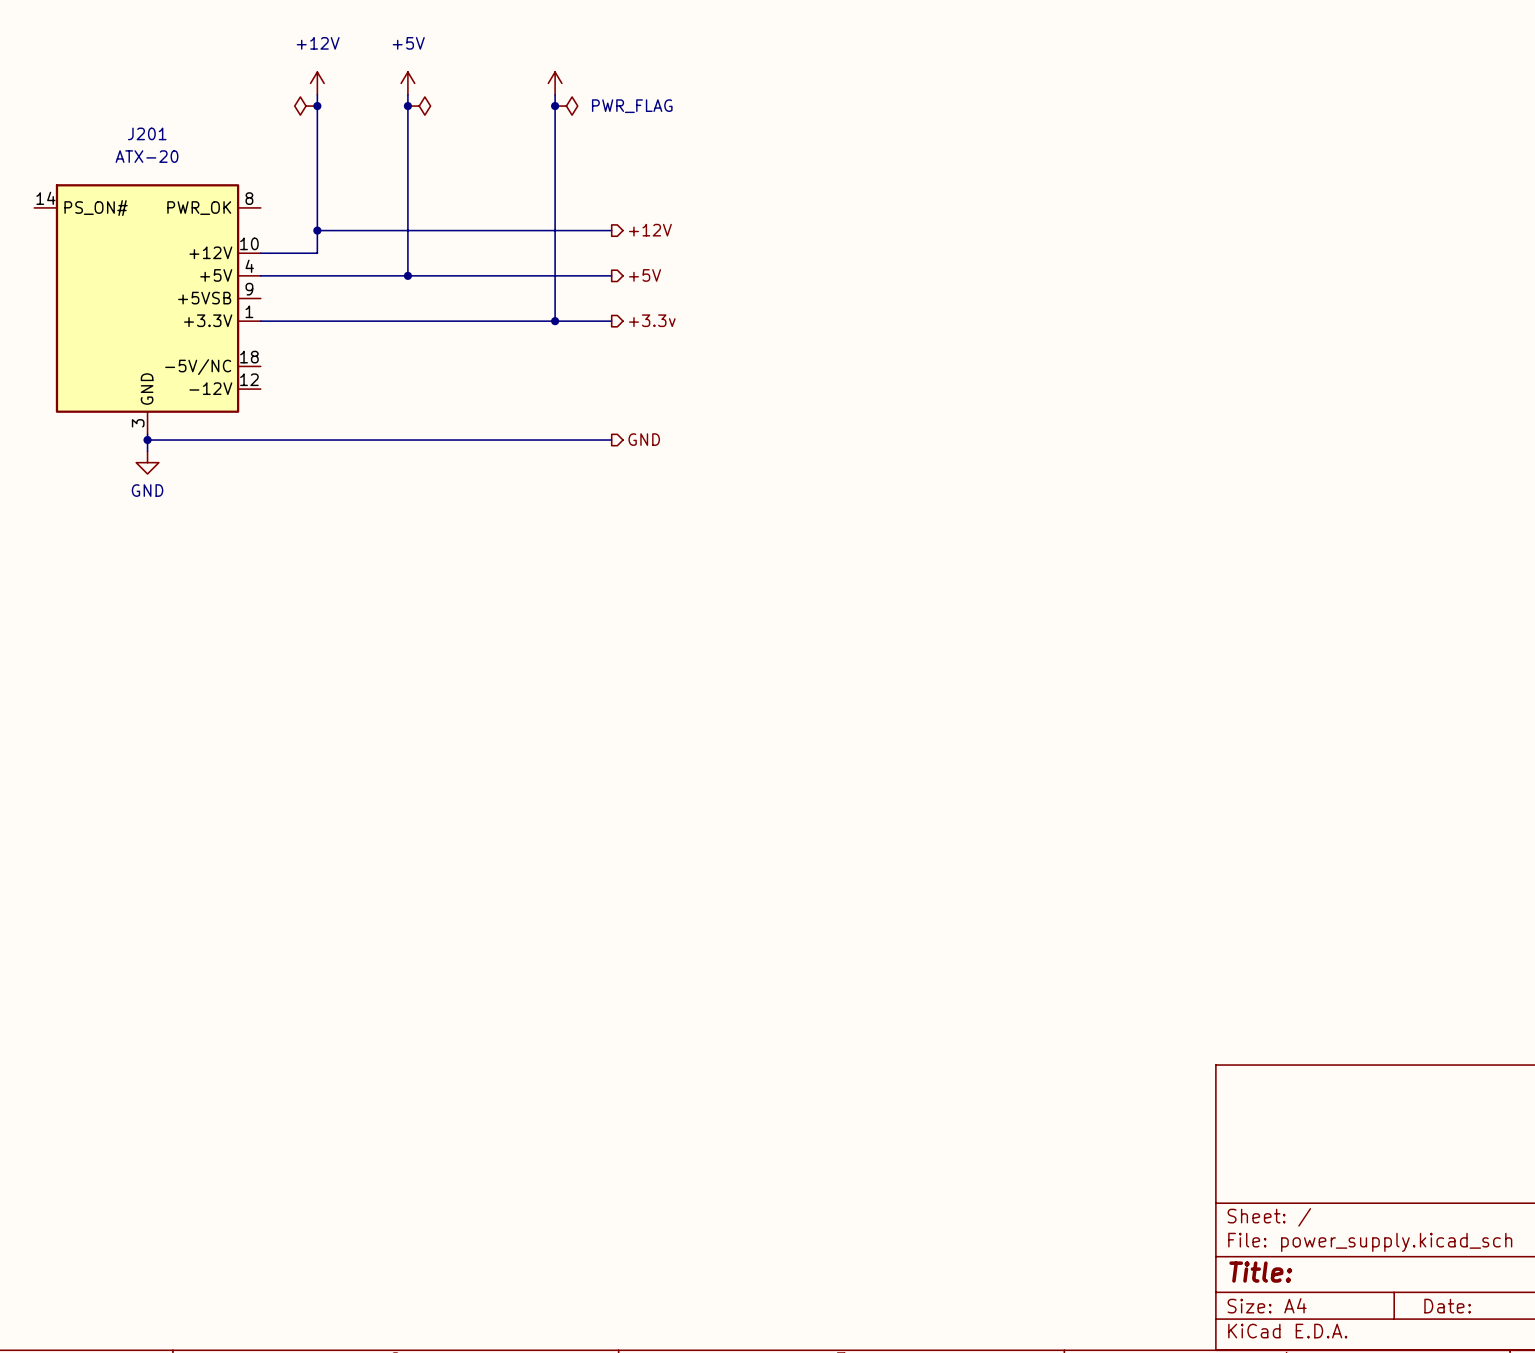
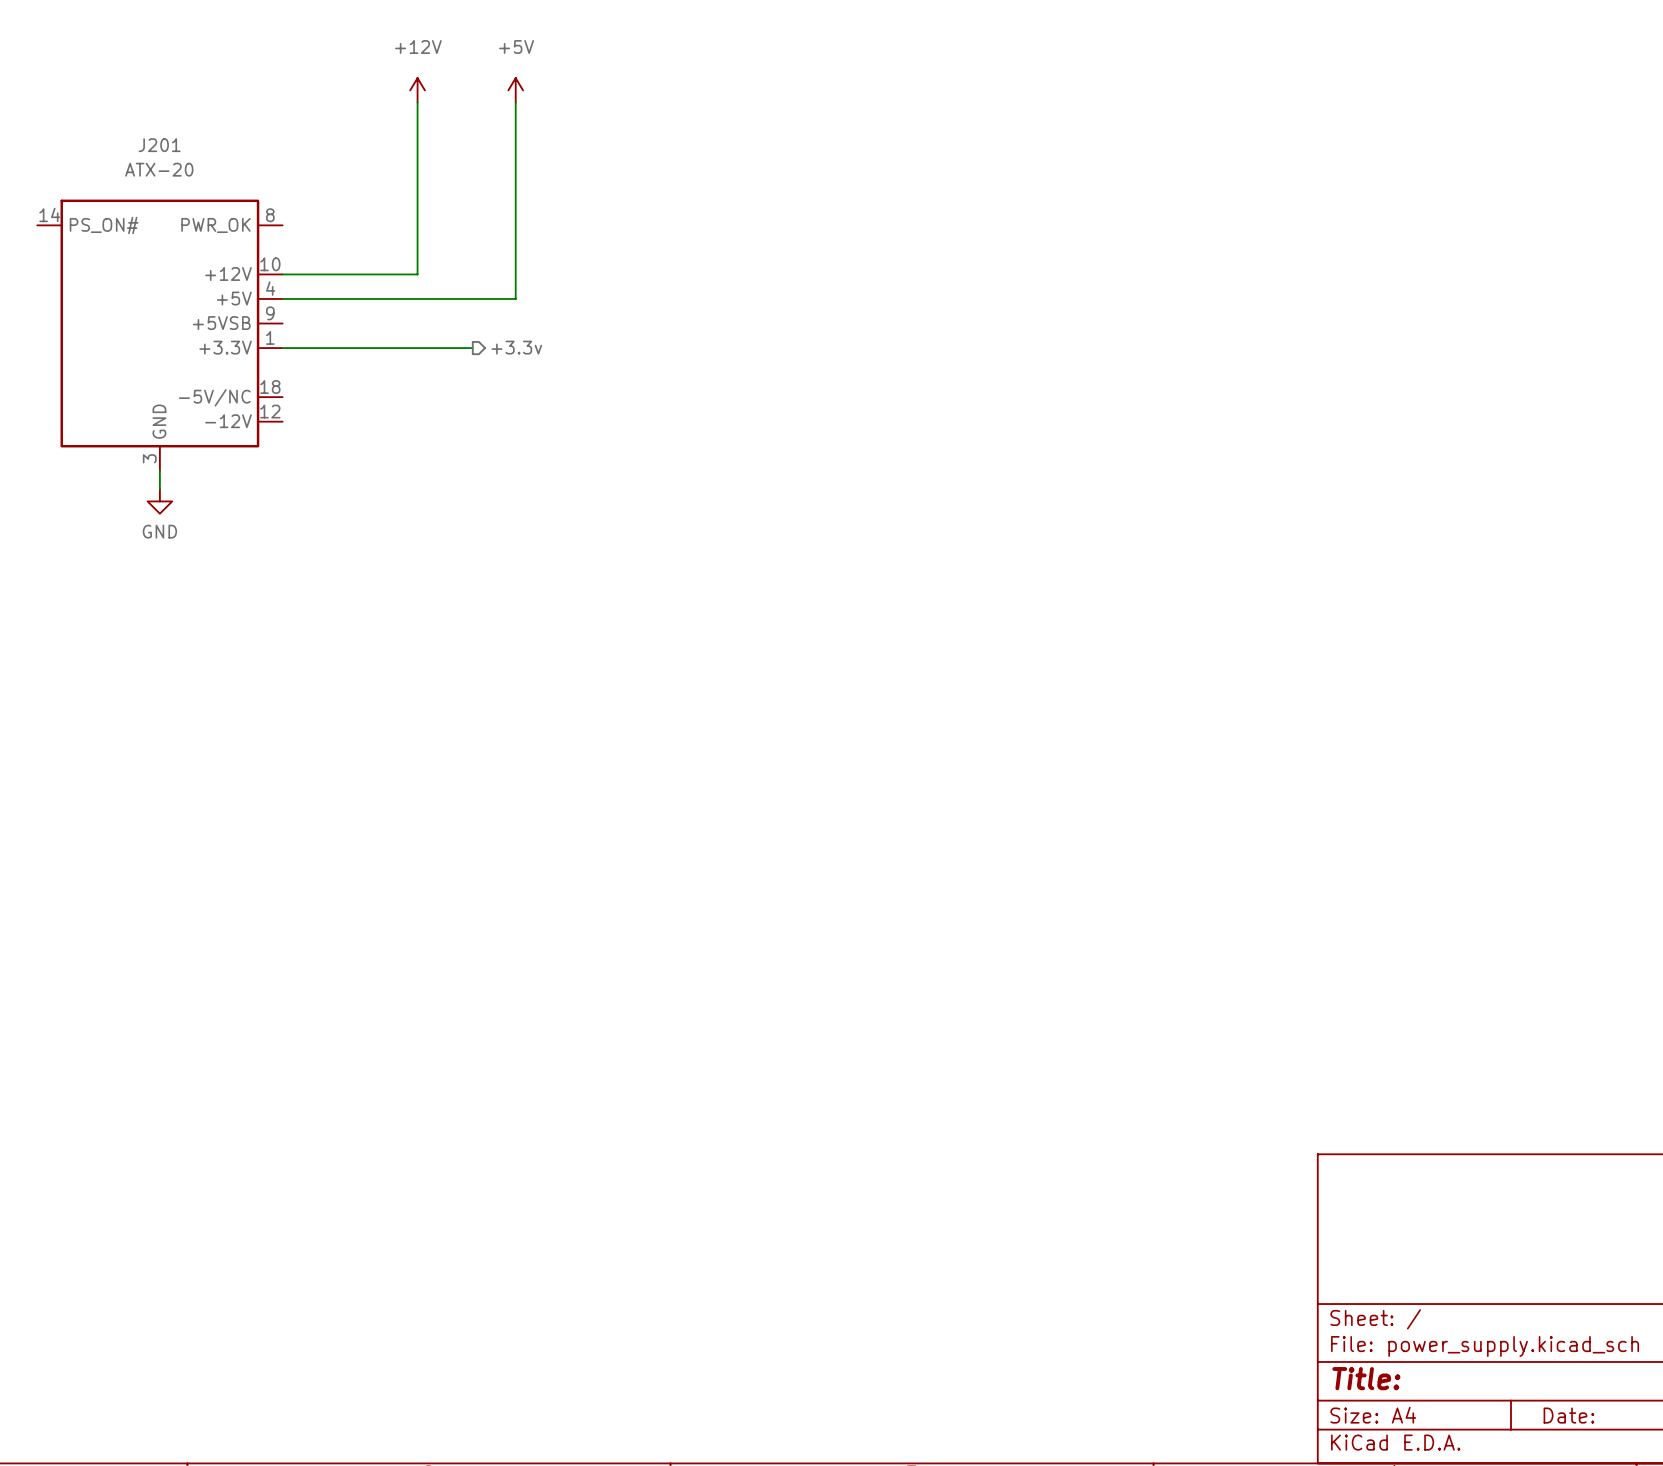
power symbol position: +12V (317, 83) -> +12V (417, 90)
power symbol position: +5V (407, 83) -> +5V (515, 90)
power symbol: (555, 83) -> none
wire: (317, 94) (317, 253) -> (417, 102) (417, 274) (343, 274)
wire: (407, 94) (407, 275) -> none
wire: (555, 94) (555, 321) -> none
power symbol: (306, 106) -> none
junction: (317, 106) -> none
junction: (407, 106) -> none
power symbol: (419, 106) -> none
junction: (555, 106) -> none
power symbol: PWR_FLAG (566, 106) -> none
wire: (317, 230) (611, 230) -> none
junction: (317, 230) -> none
hierarchical label: +12V (650, 230) -> none
junction: (407, 275) -> none
wire: (475, 275) (611, 275) -> (515, 298) (515, 102)
hierarchical label: +5V (645, 275) -> none
hierarchical label position: +3.3v (652, 320) -> +3.3v (516, 347)
wire: (436, 321) (611, 321) -> none
junction: (555, 321) -> none
hierarchical label: GND (644, 439) -> none
wire: (147, 440) (611, 440) -> none
junction: (147, 440) -> none

